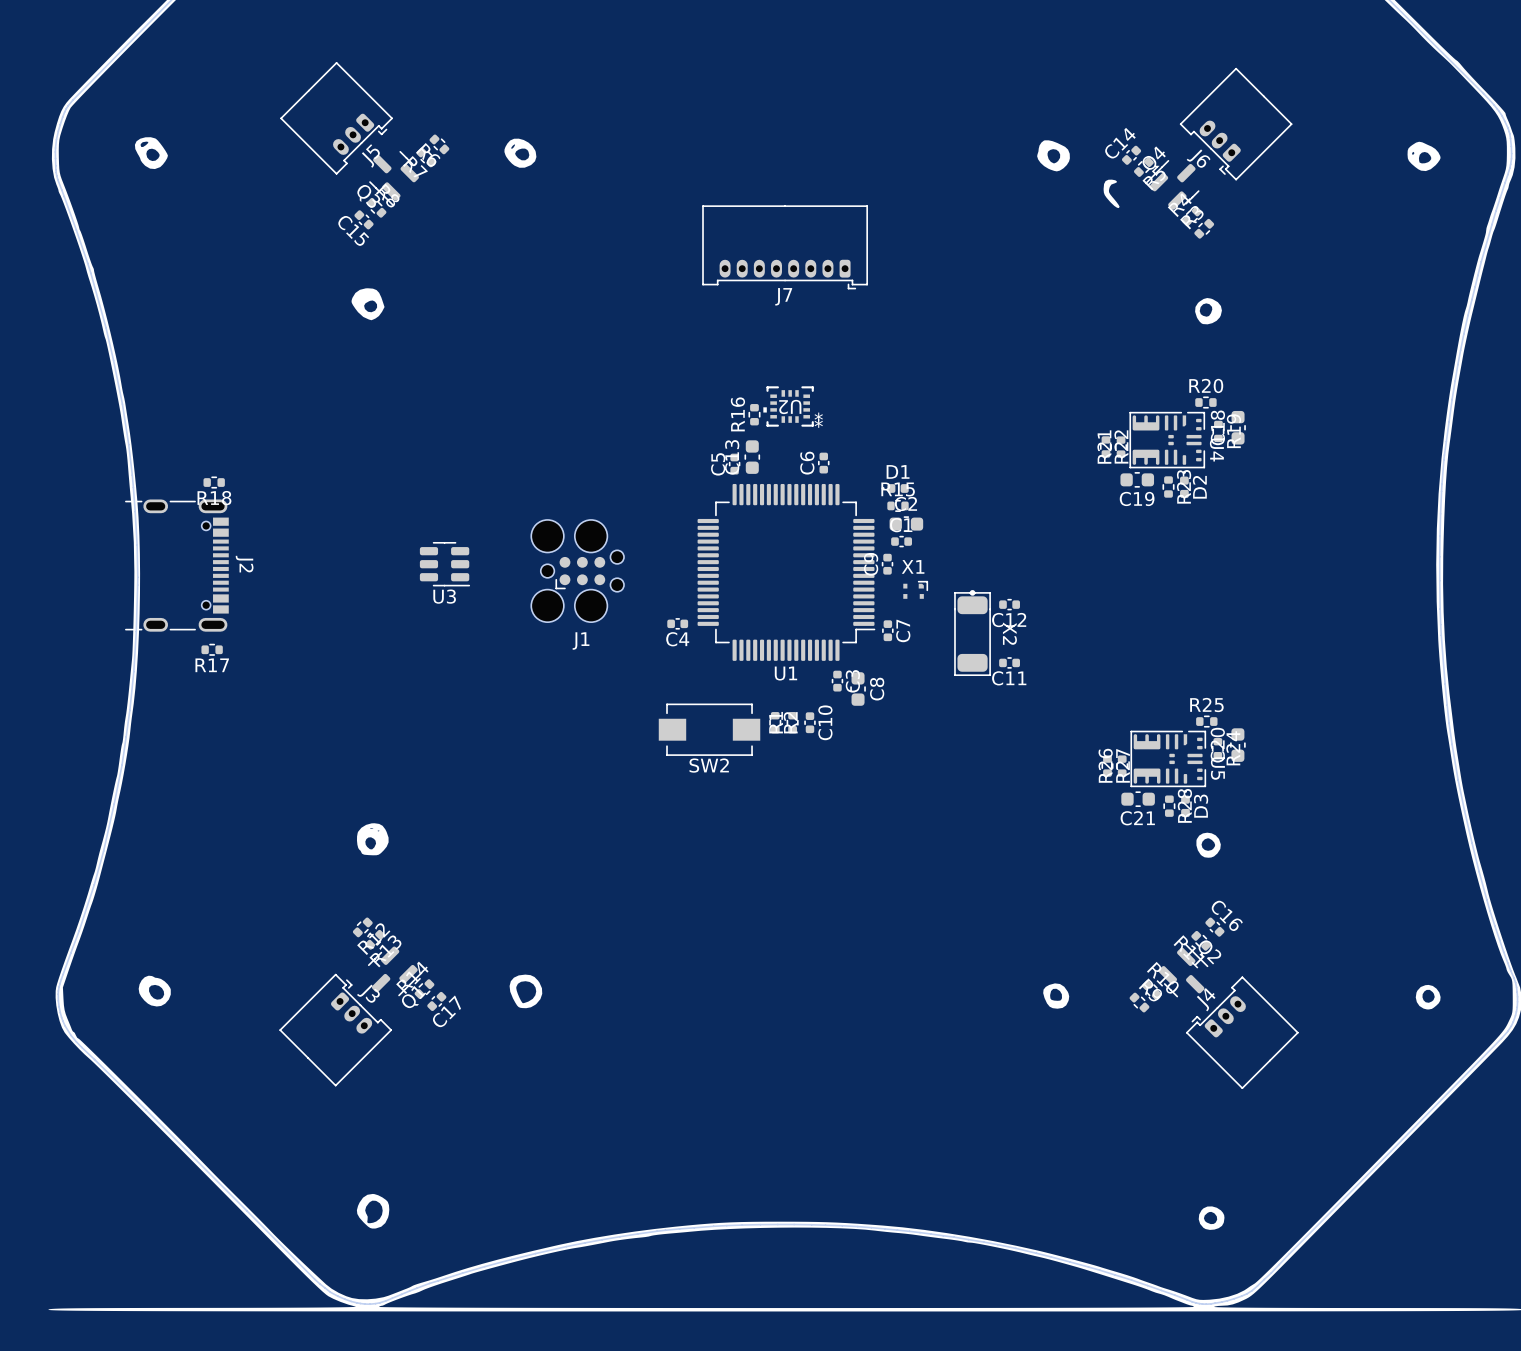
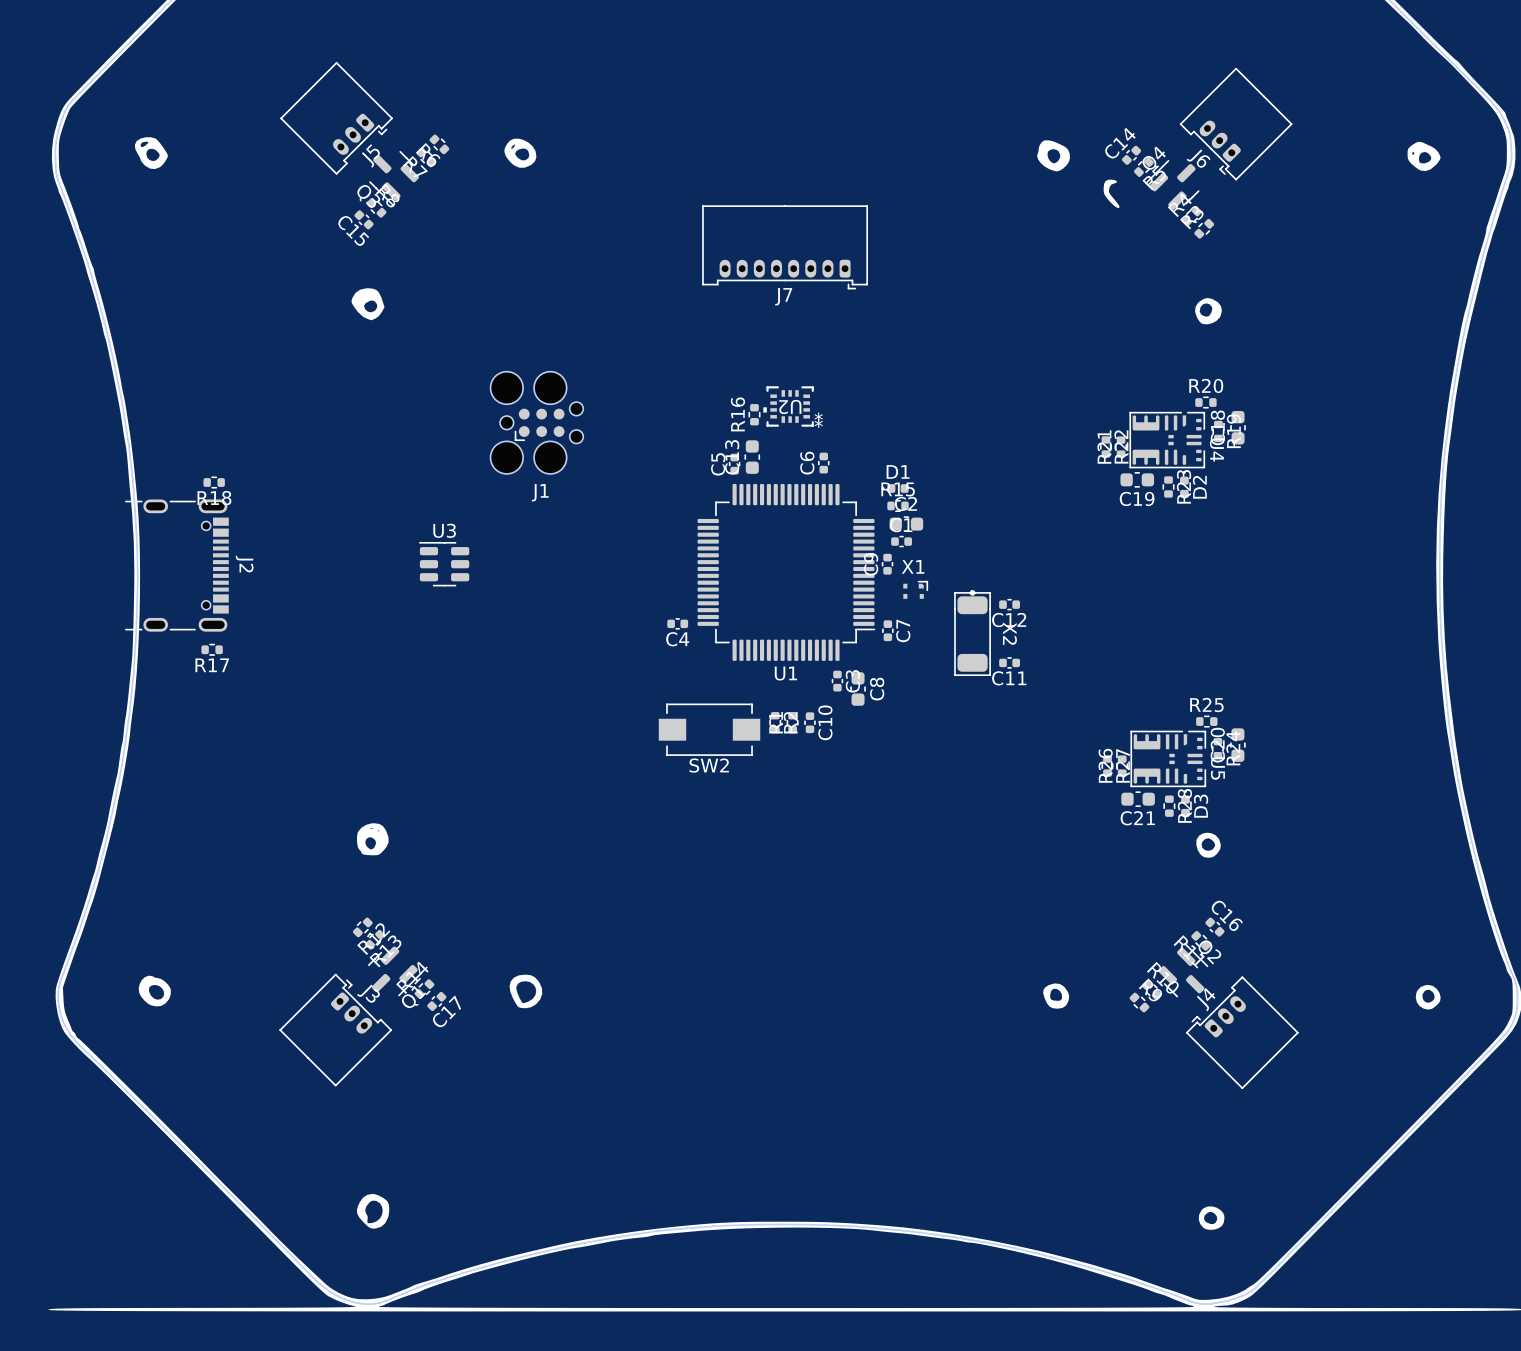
U3 rotation: 0° (444, 564) -> 180° (444, 564)
J1 position: (577, 571) -> (536, 422)

